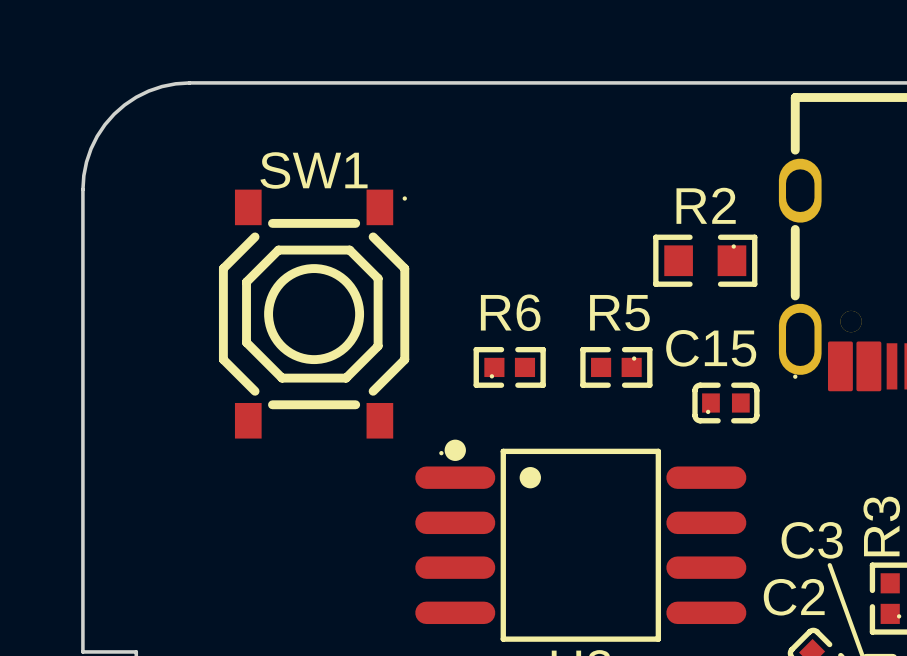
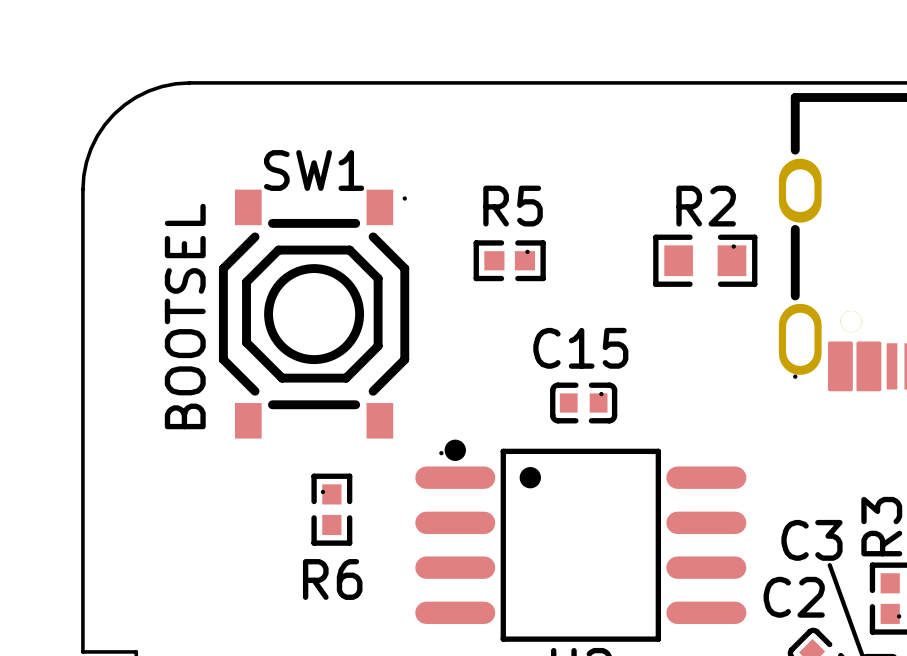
R6 name position: R6 (510, 312) -> R6 (332, 579)
text: none -> BOOTSEL (185, 316)
R6 rotation: 0° (509, 367) -> 90° clockwise (331, 509)
R6 position: (509, 367) -> (331, 509)
R5 position: (616, 367) -> (509, 260)
C15 rotation: 0° (725, 402) -> 180° (583, 402)
C15 position: (725, 402) -> (583, 402)

